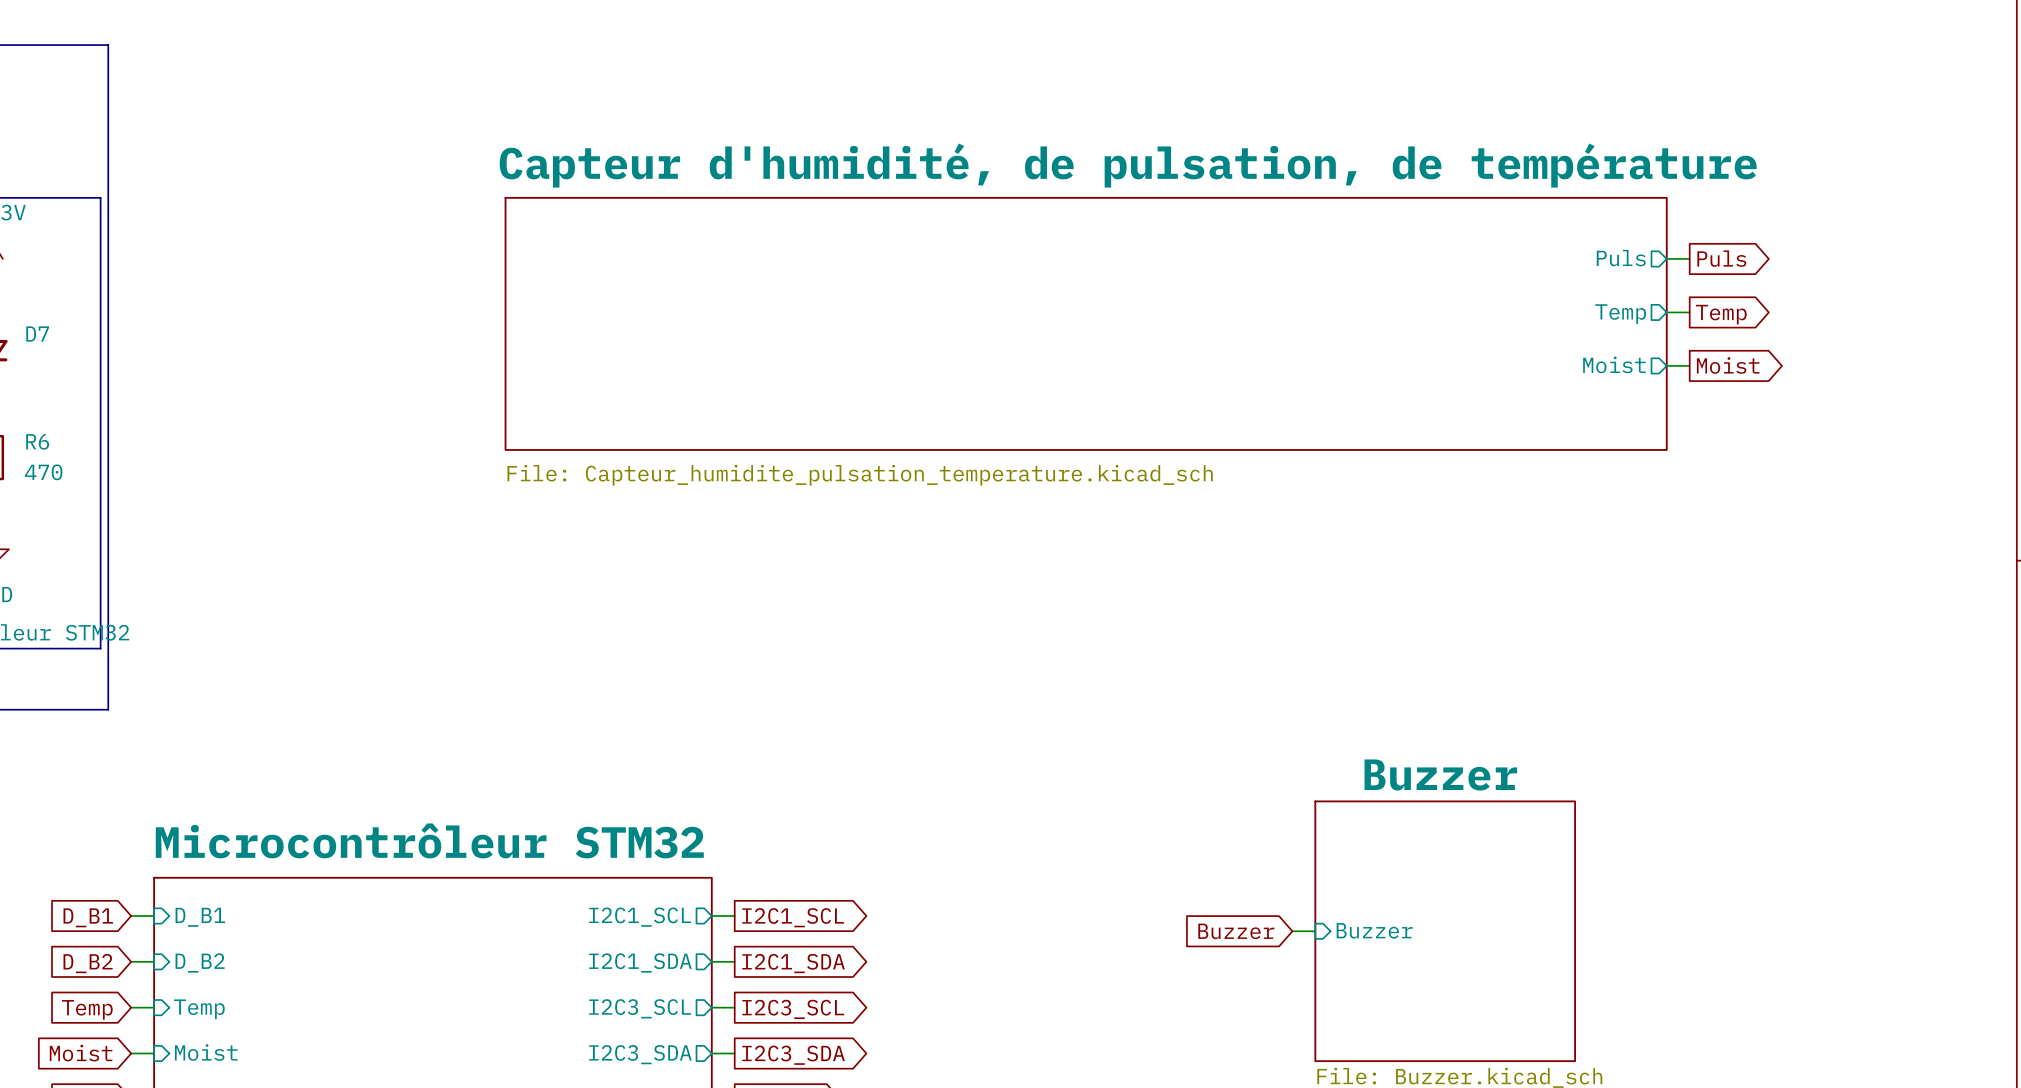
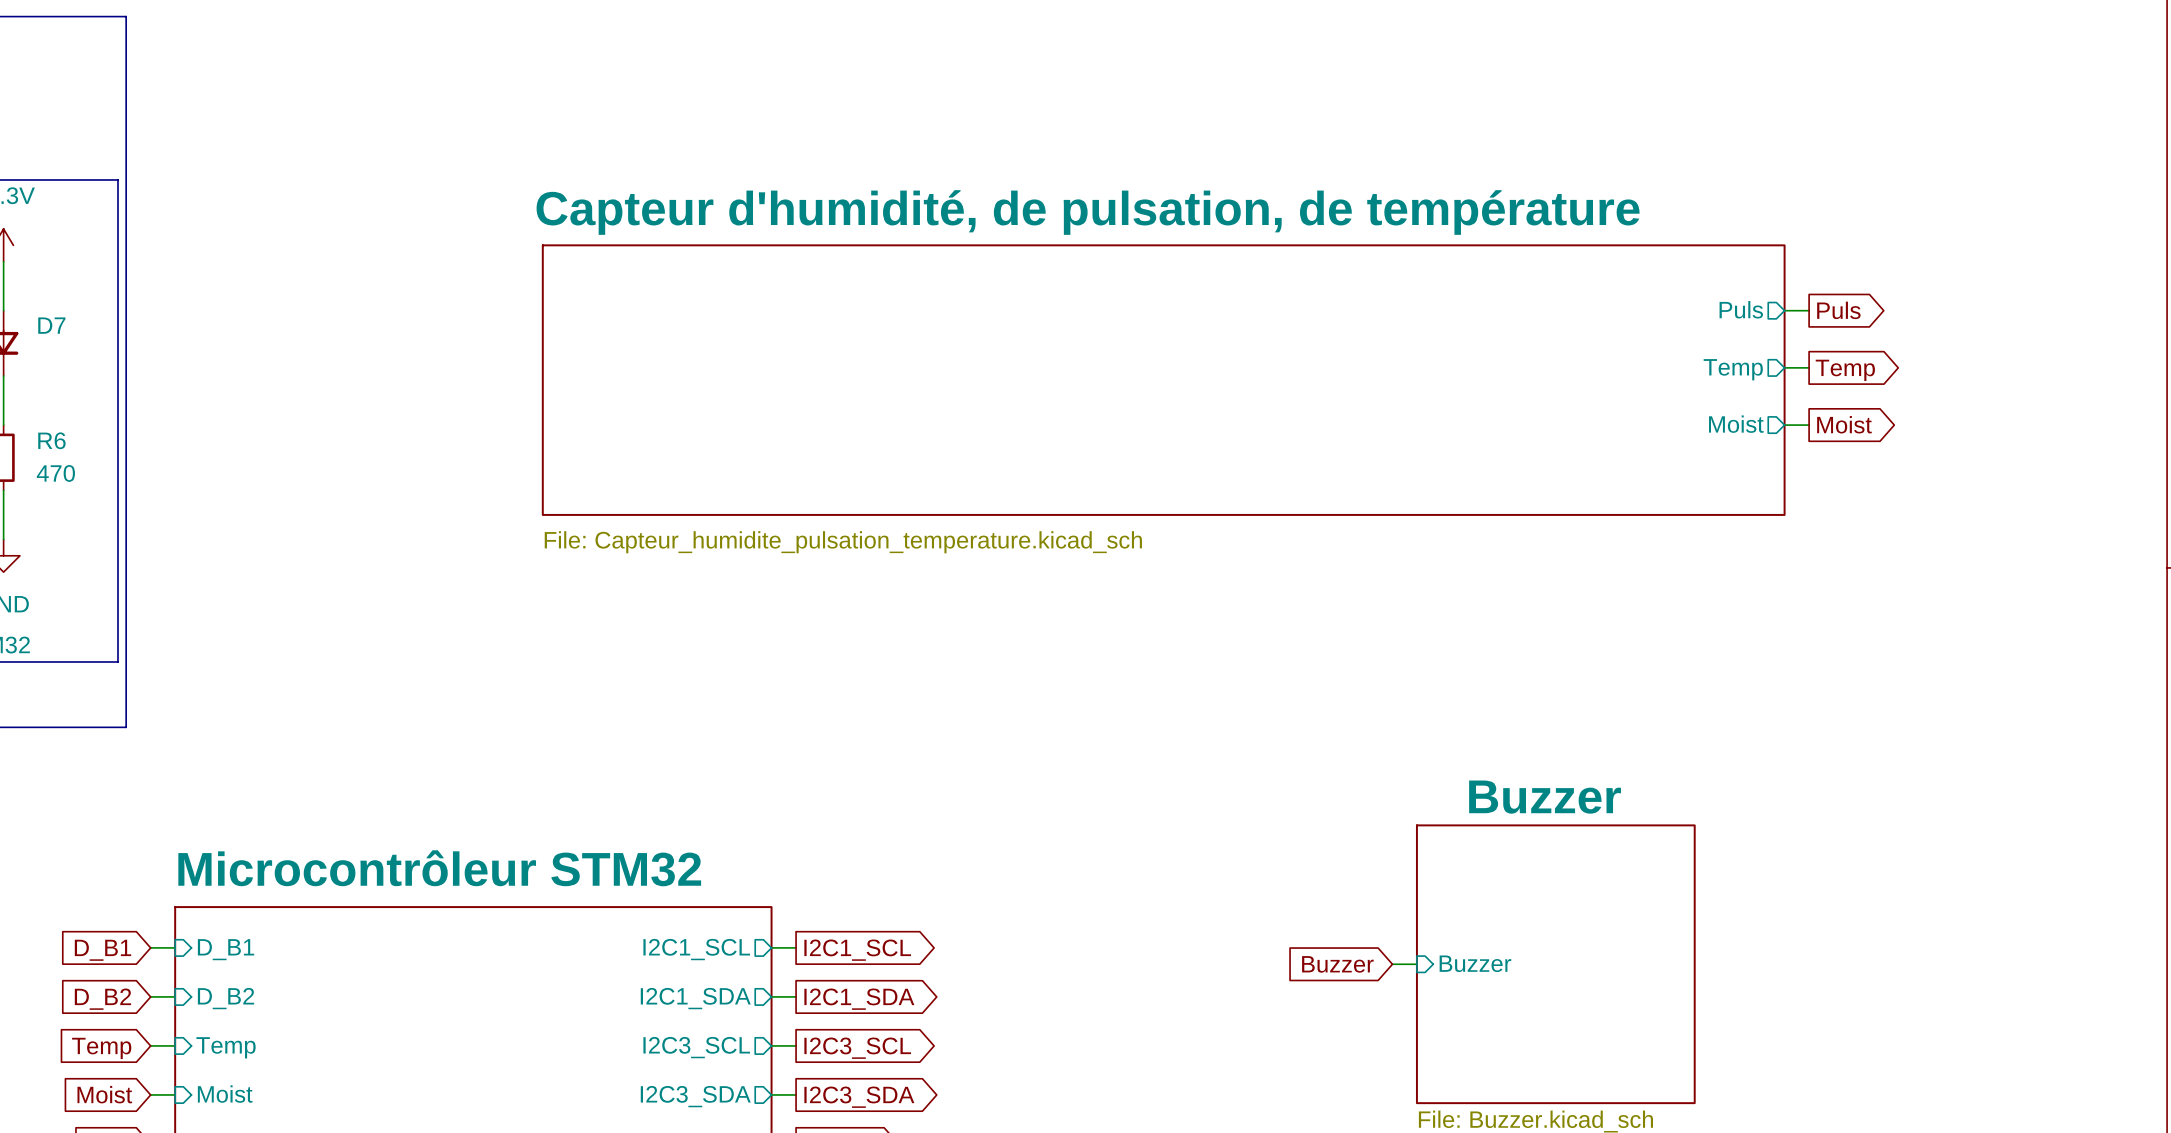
sheet pin position: Puls (1621, 258) -> Puls (1741, 309)
wire: (1666, 258) (1689, 258) -> (1784, 310) (1809, 310)
global label position: Puls (1721, 258) -> Puls (1838, 310)
wire: (1666, 312) (1689, 312) -> (1784, 367) (1809, 367)
sheet pin position: Temp (1620, 314) -> Temp (1733, 369)
global label position: Temp (1721, 314) -> Temp (1845, 370)
sheet Capteur d'humidité, de pulsation, de température position: (1086, 323) -> (1163, 380)
sheet pin position: Moist (1614, 364) -> Moist (1736, 424)
wire: (1666, 365) (1689, 365) -> (1784, 425) (1809, 425)
global label position: Moist (1728, 365) -> Moist (1844, 424)

